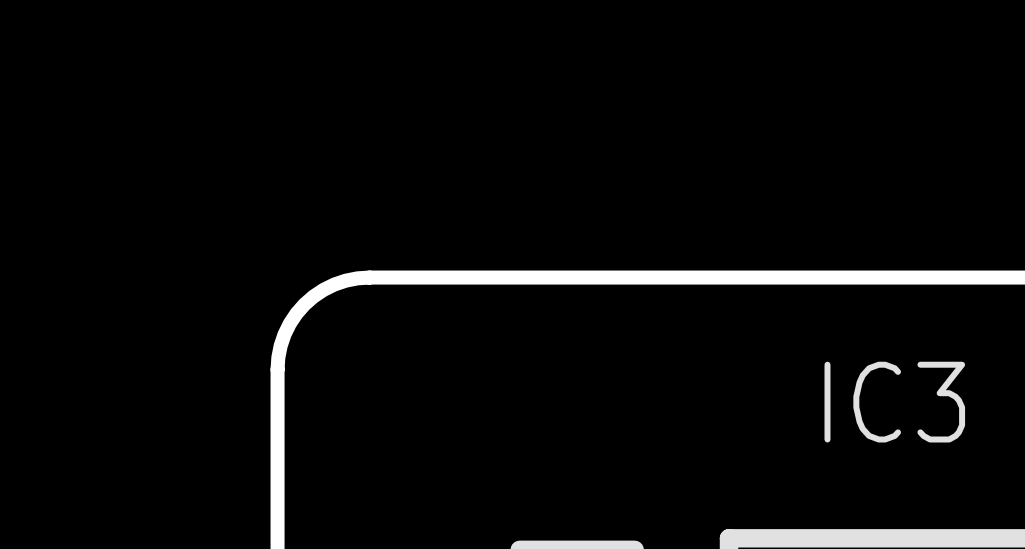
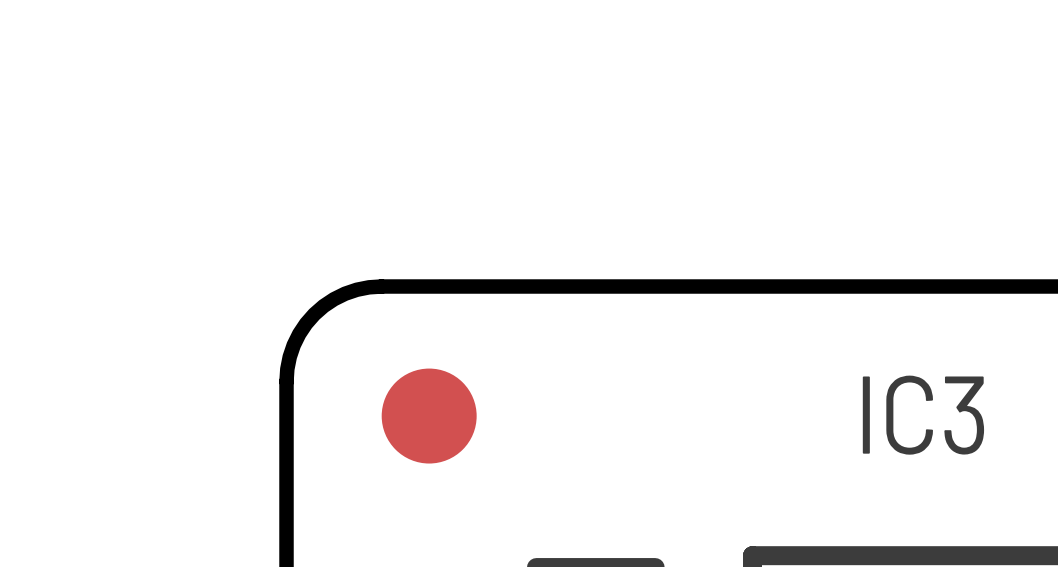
part: none -> (429, 416)

